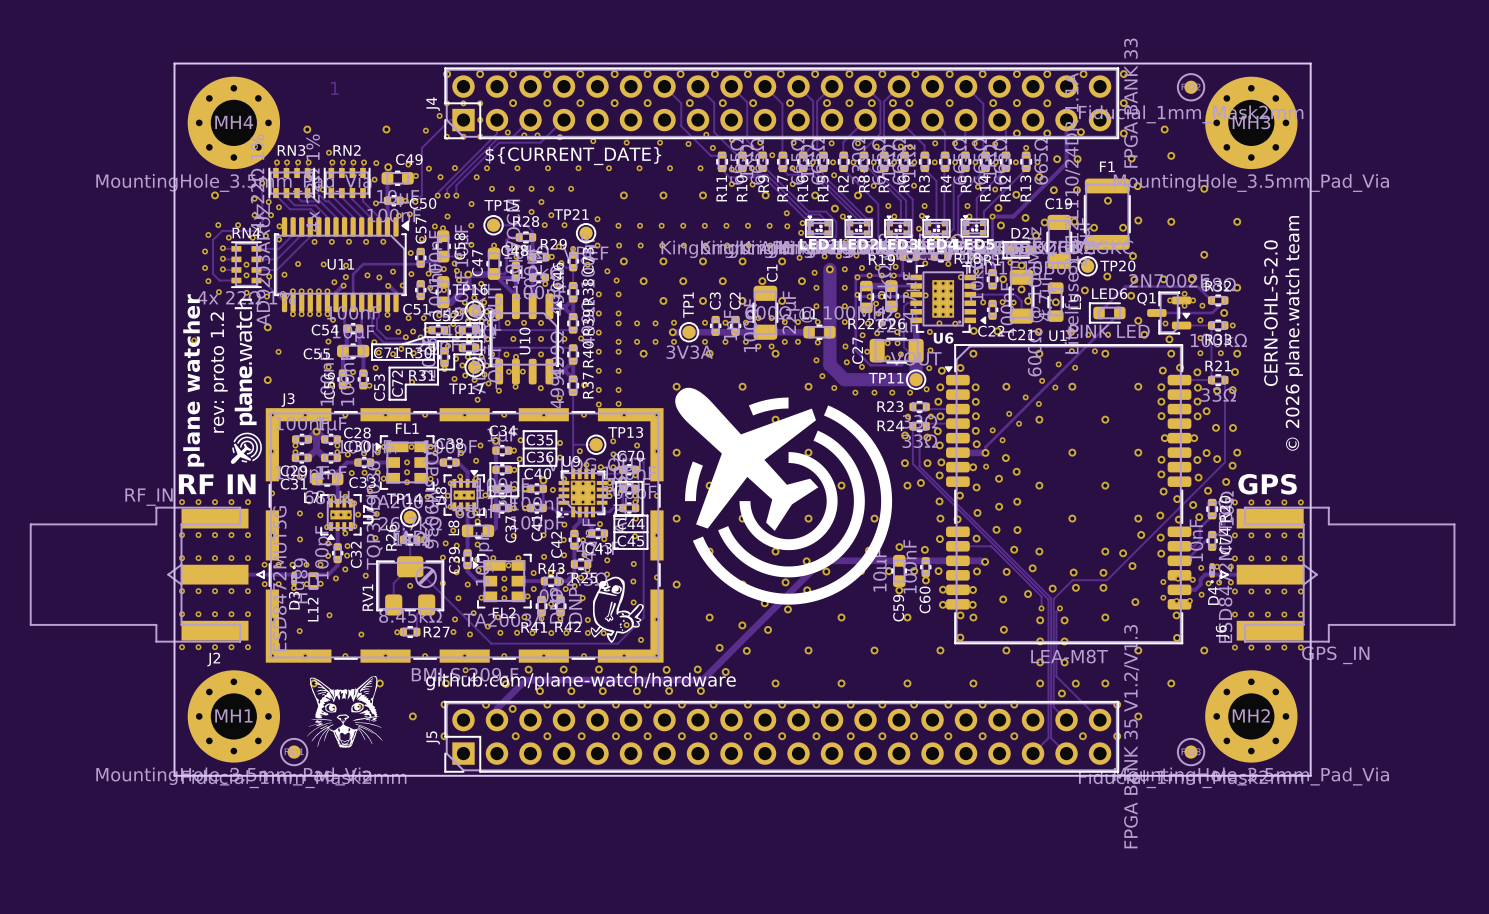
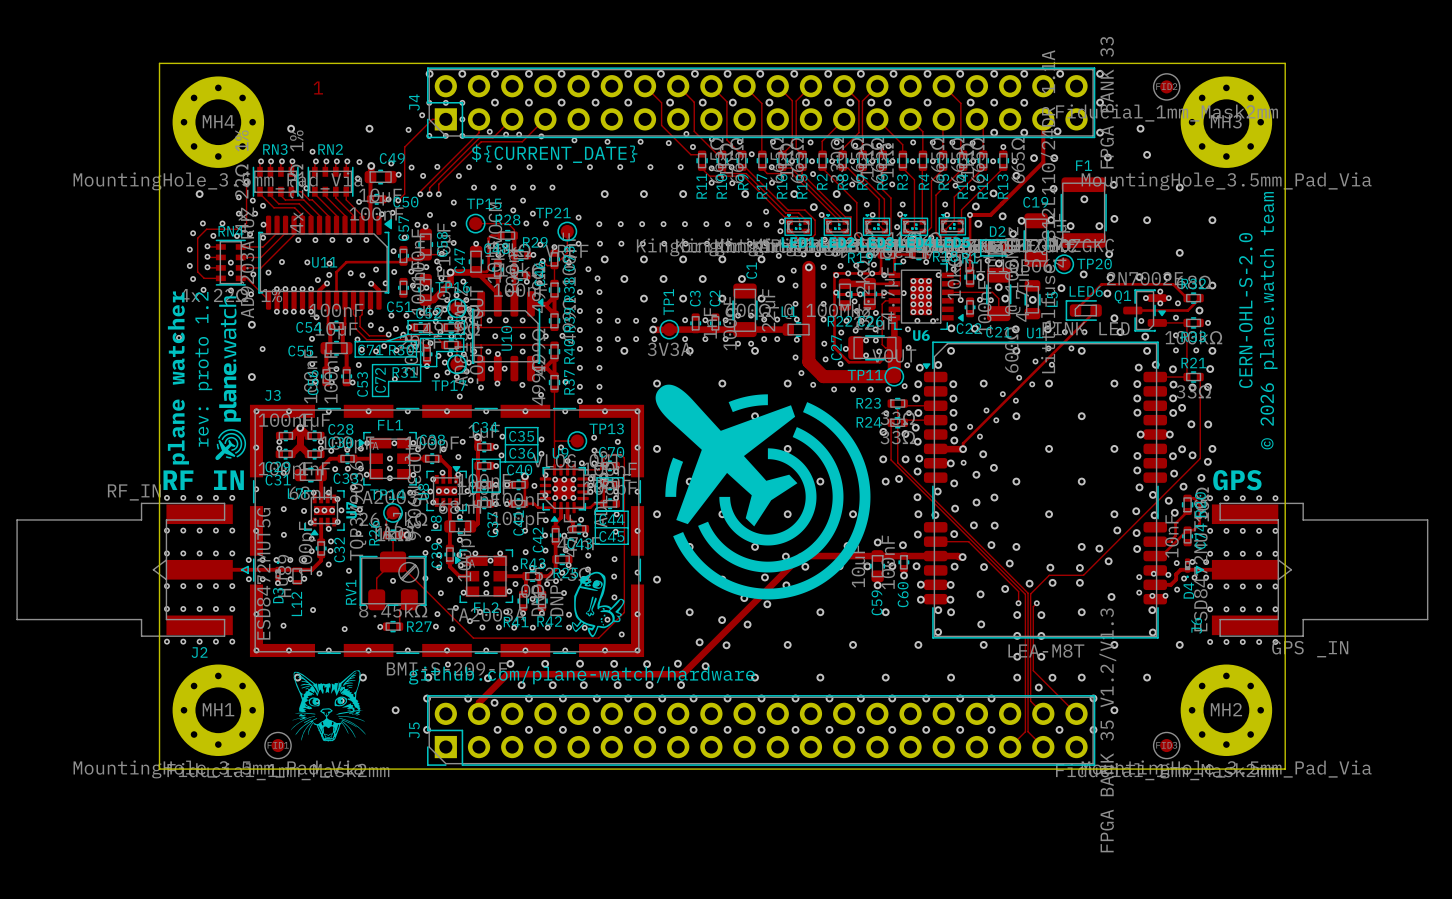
U9 footprint: [556, 468, 608, 519] -> [539, 464, 589, 522]
via: none -> (545, 495)

